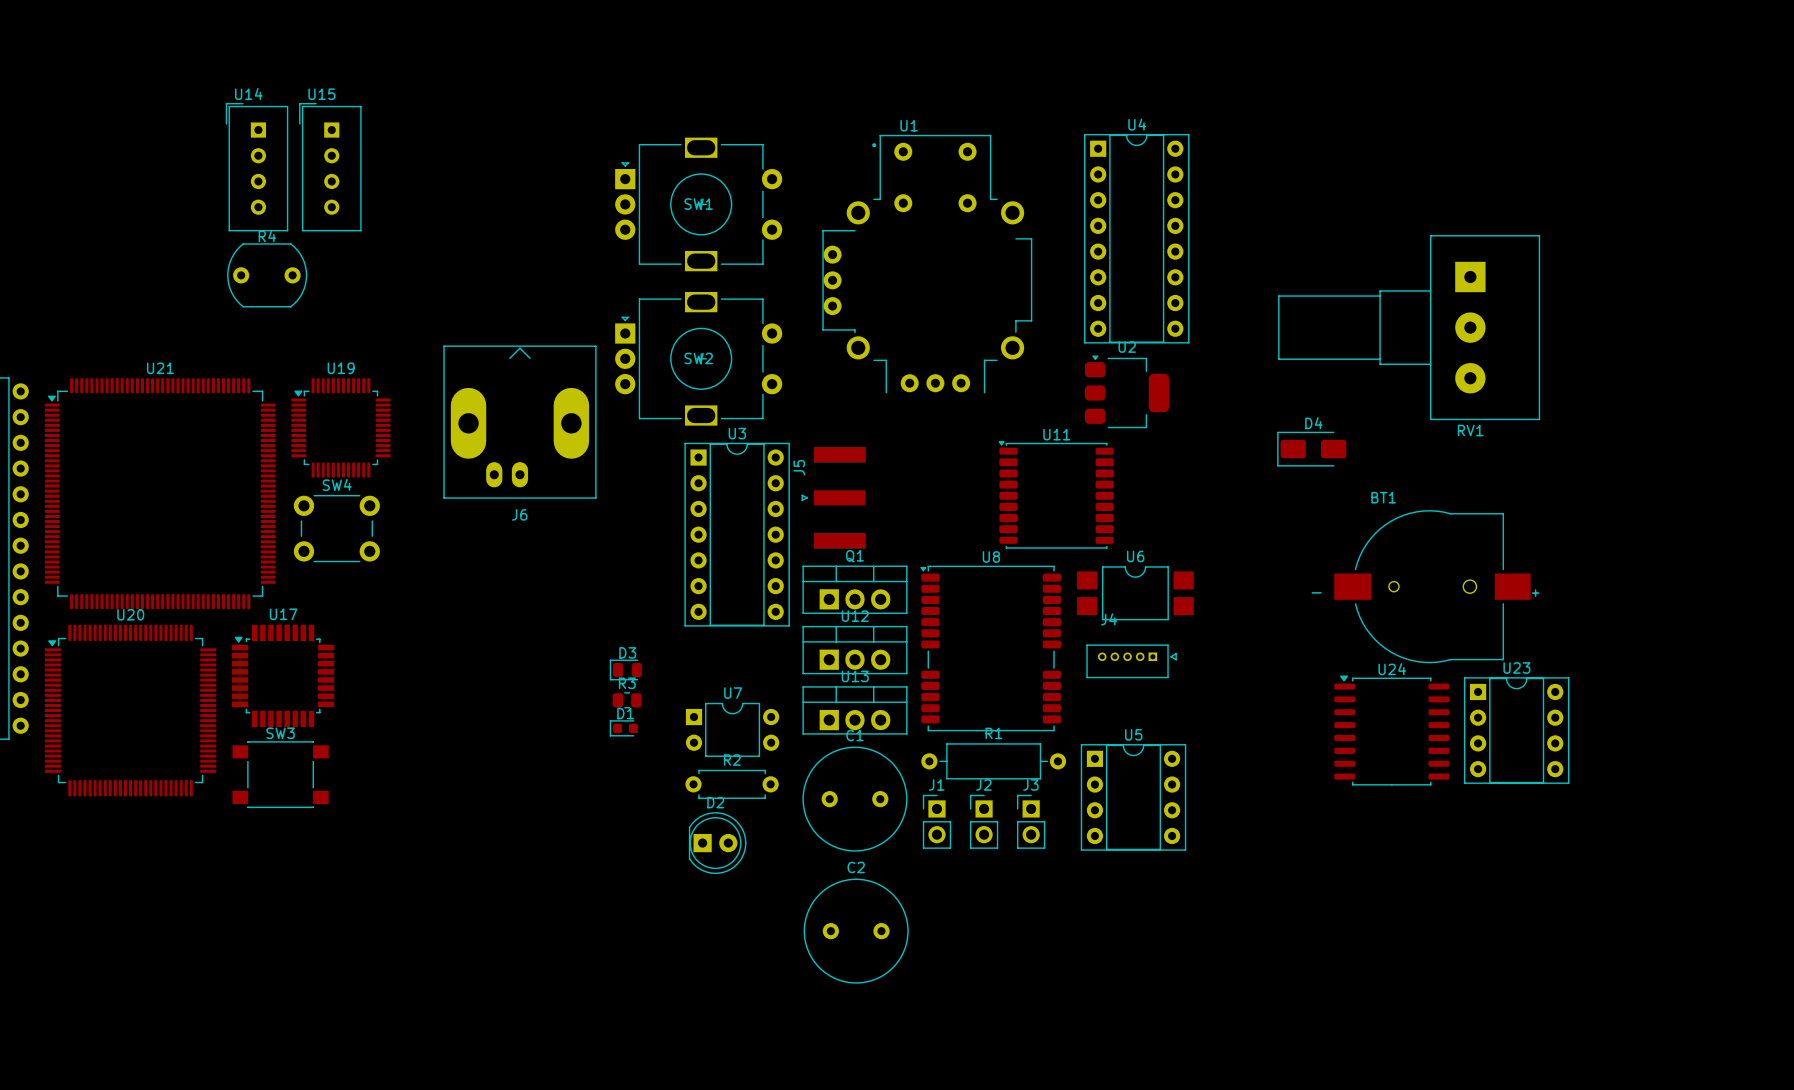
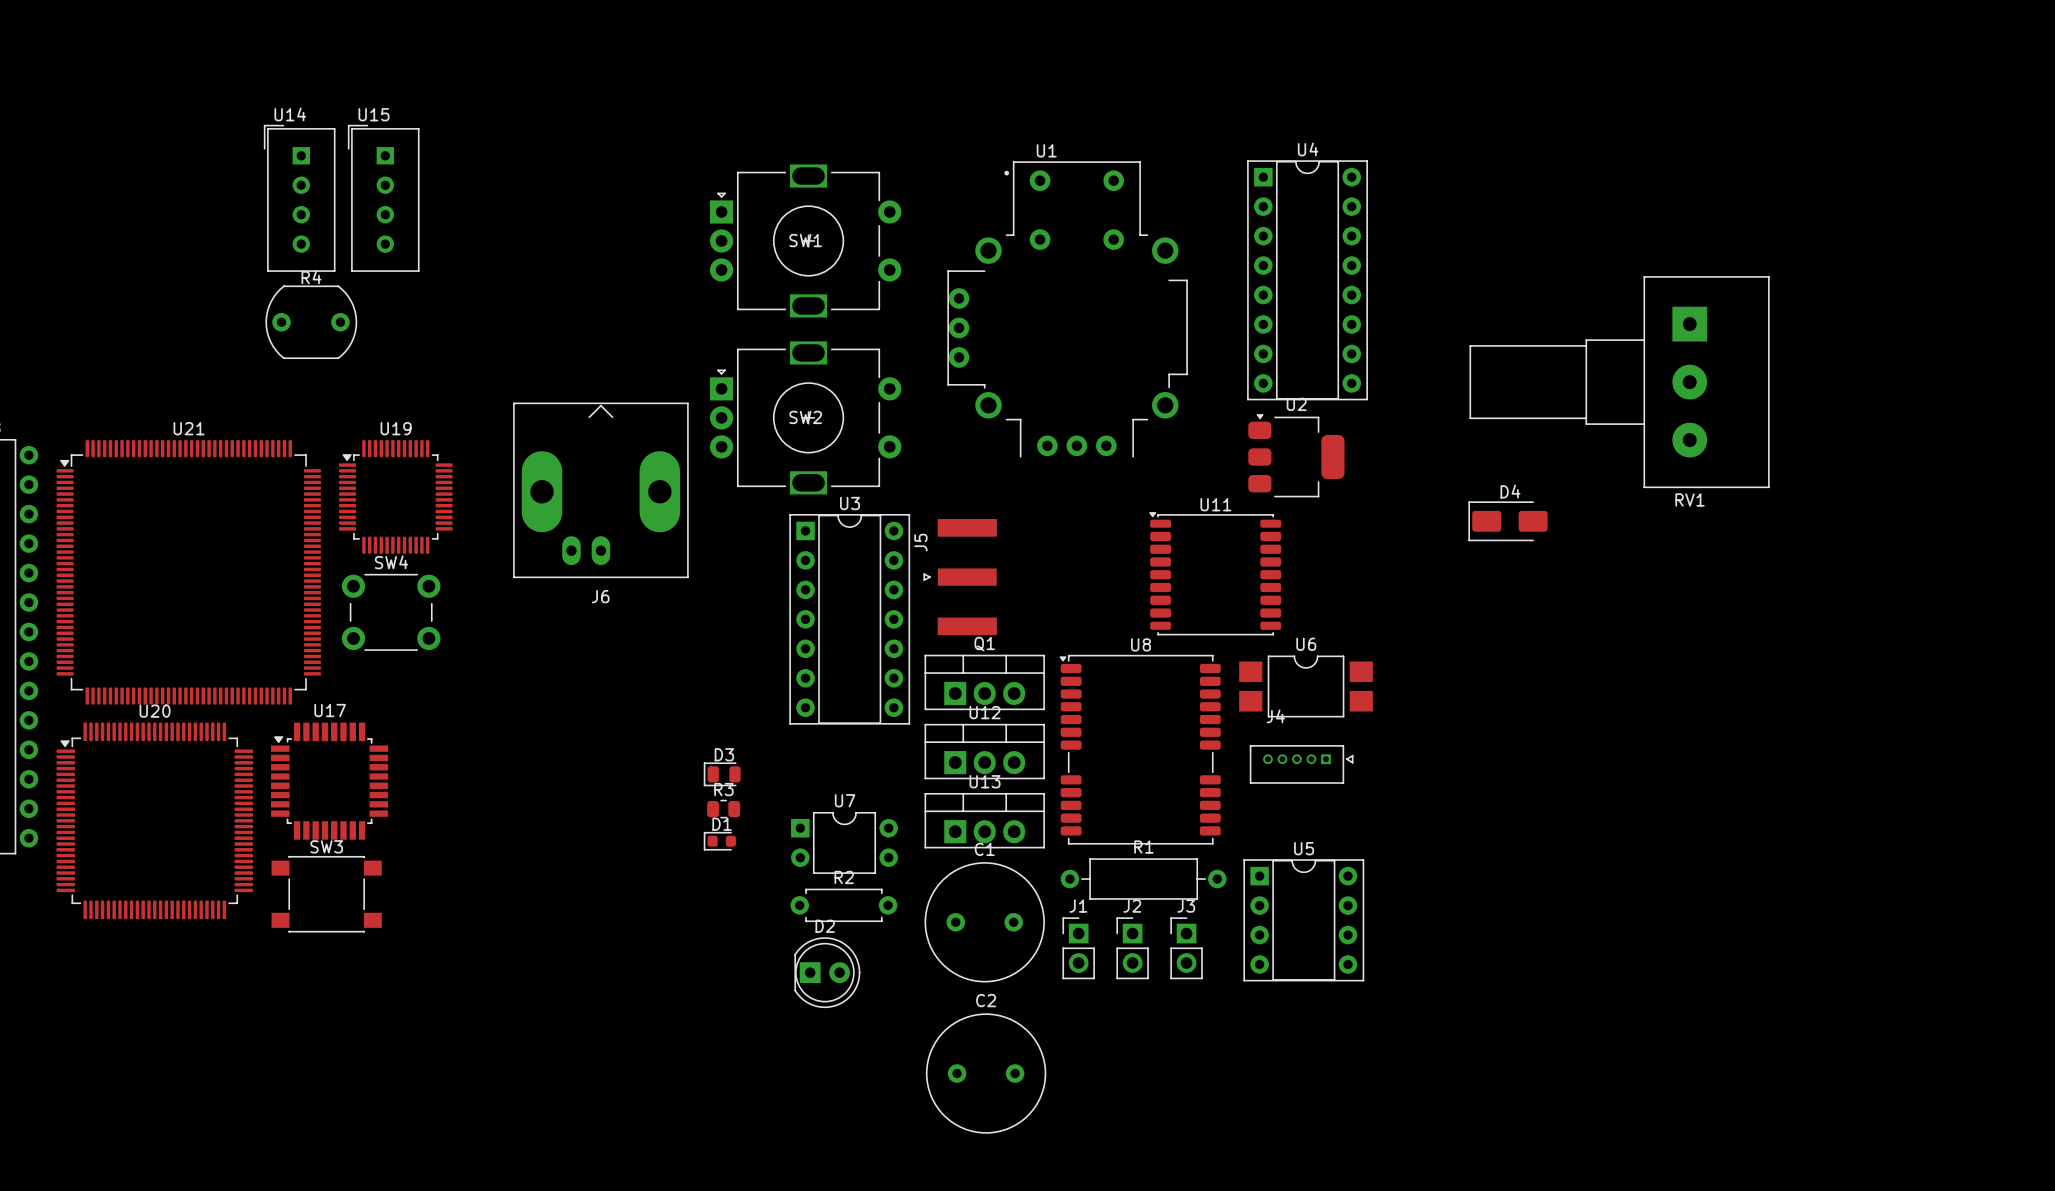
BT1: (1432, 586) -> none
U24: (1391, 730) -> none
U23: (1516, 730) -> none

